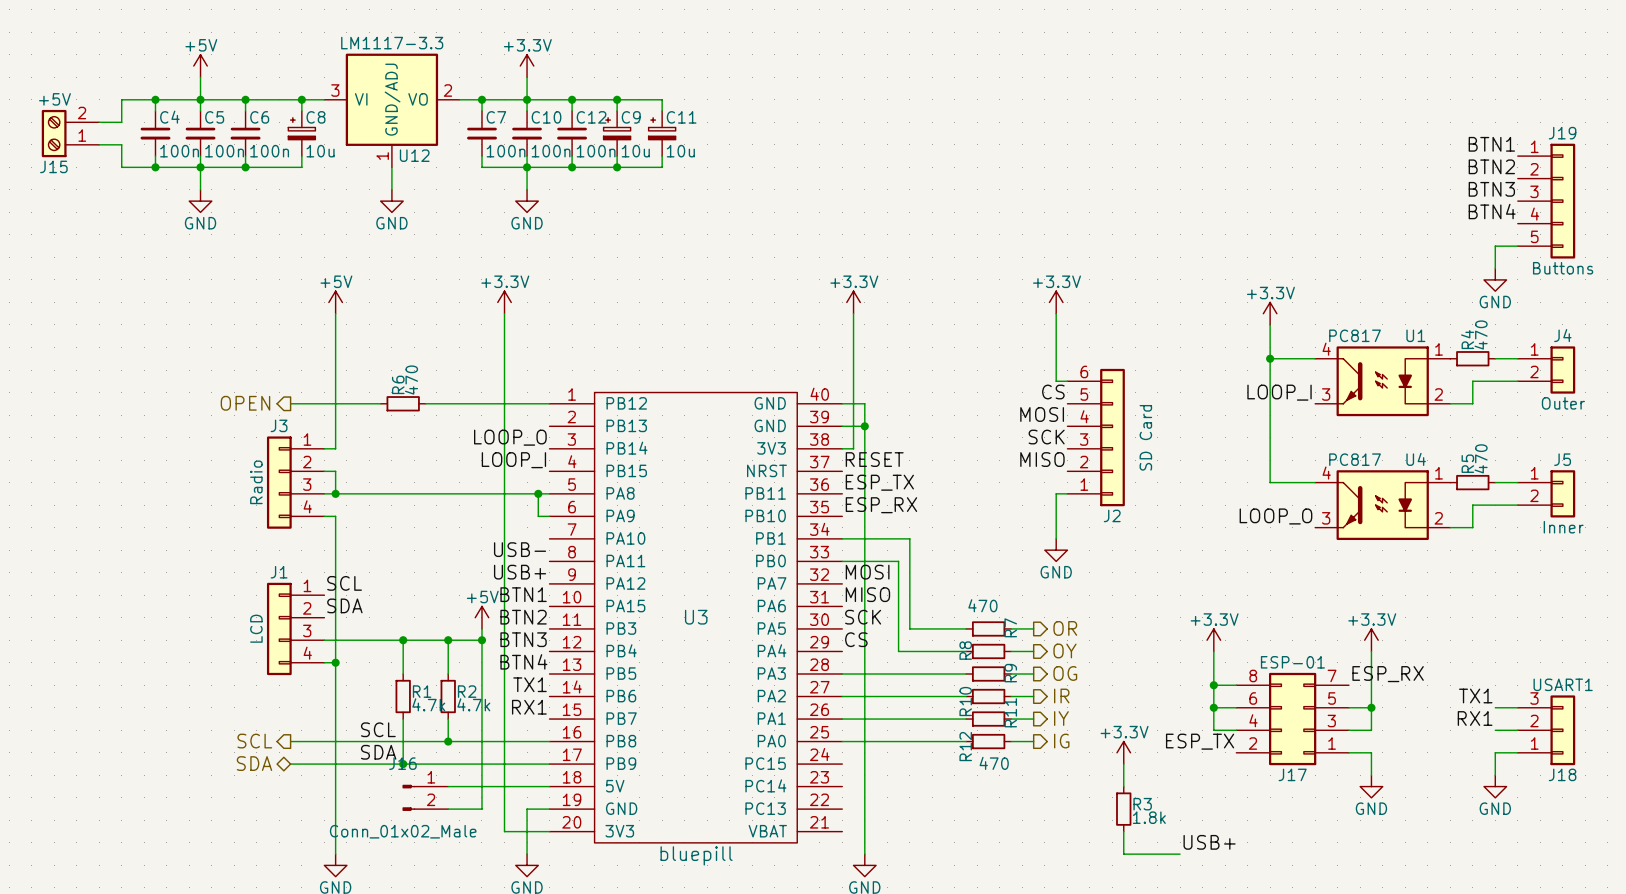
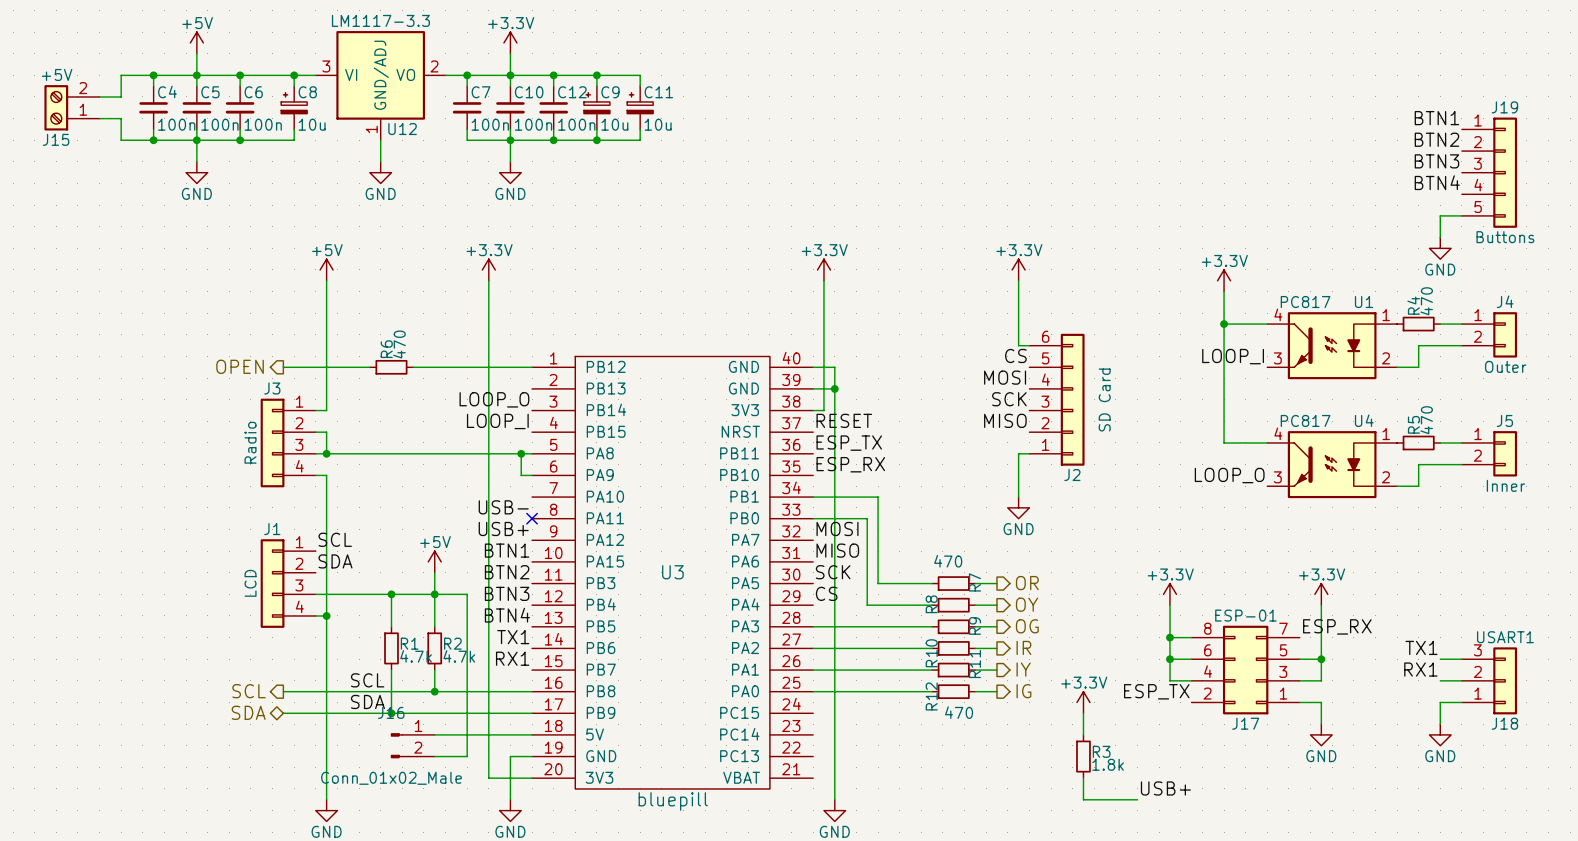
no-connect mark: none -> (532, 518)
wire: none -> (434, 572) (434, 594)
power symbol position: +5V (481, 617) -> +5V (434, 561)
wire: (481, 628) (481, 640) -> none
junction: (481, 640) -> none

